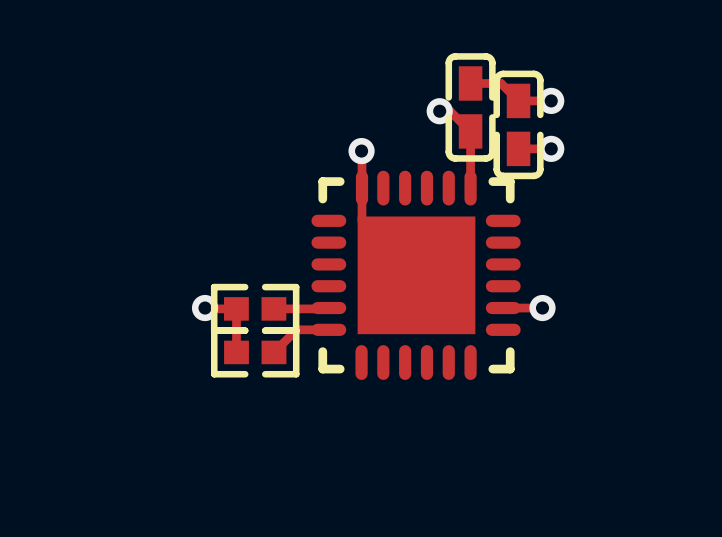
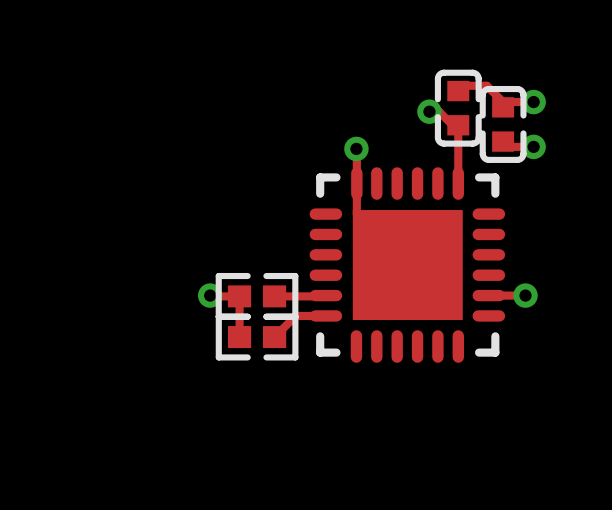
part footprint: [445, 53, 496, 162] -> [434, 69, 482, 147]
part footprint: [493, 70, 544, 180] -> [479, 85, 527, 163]

